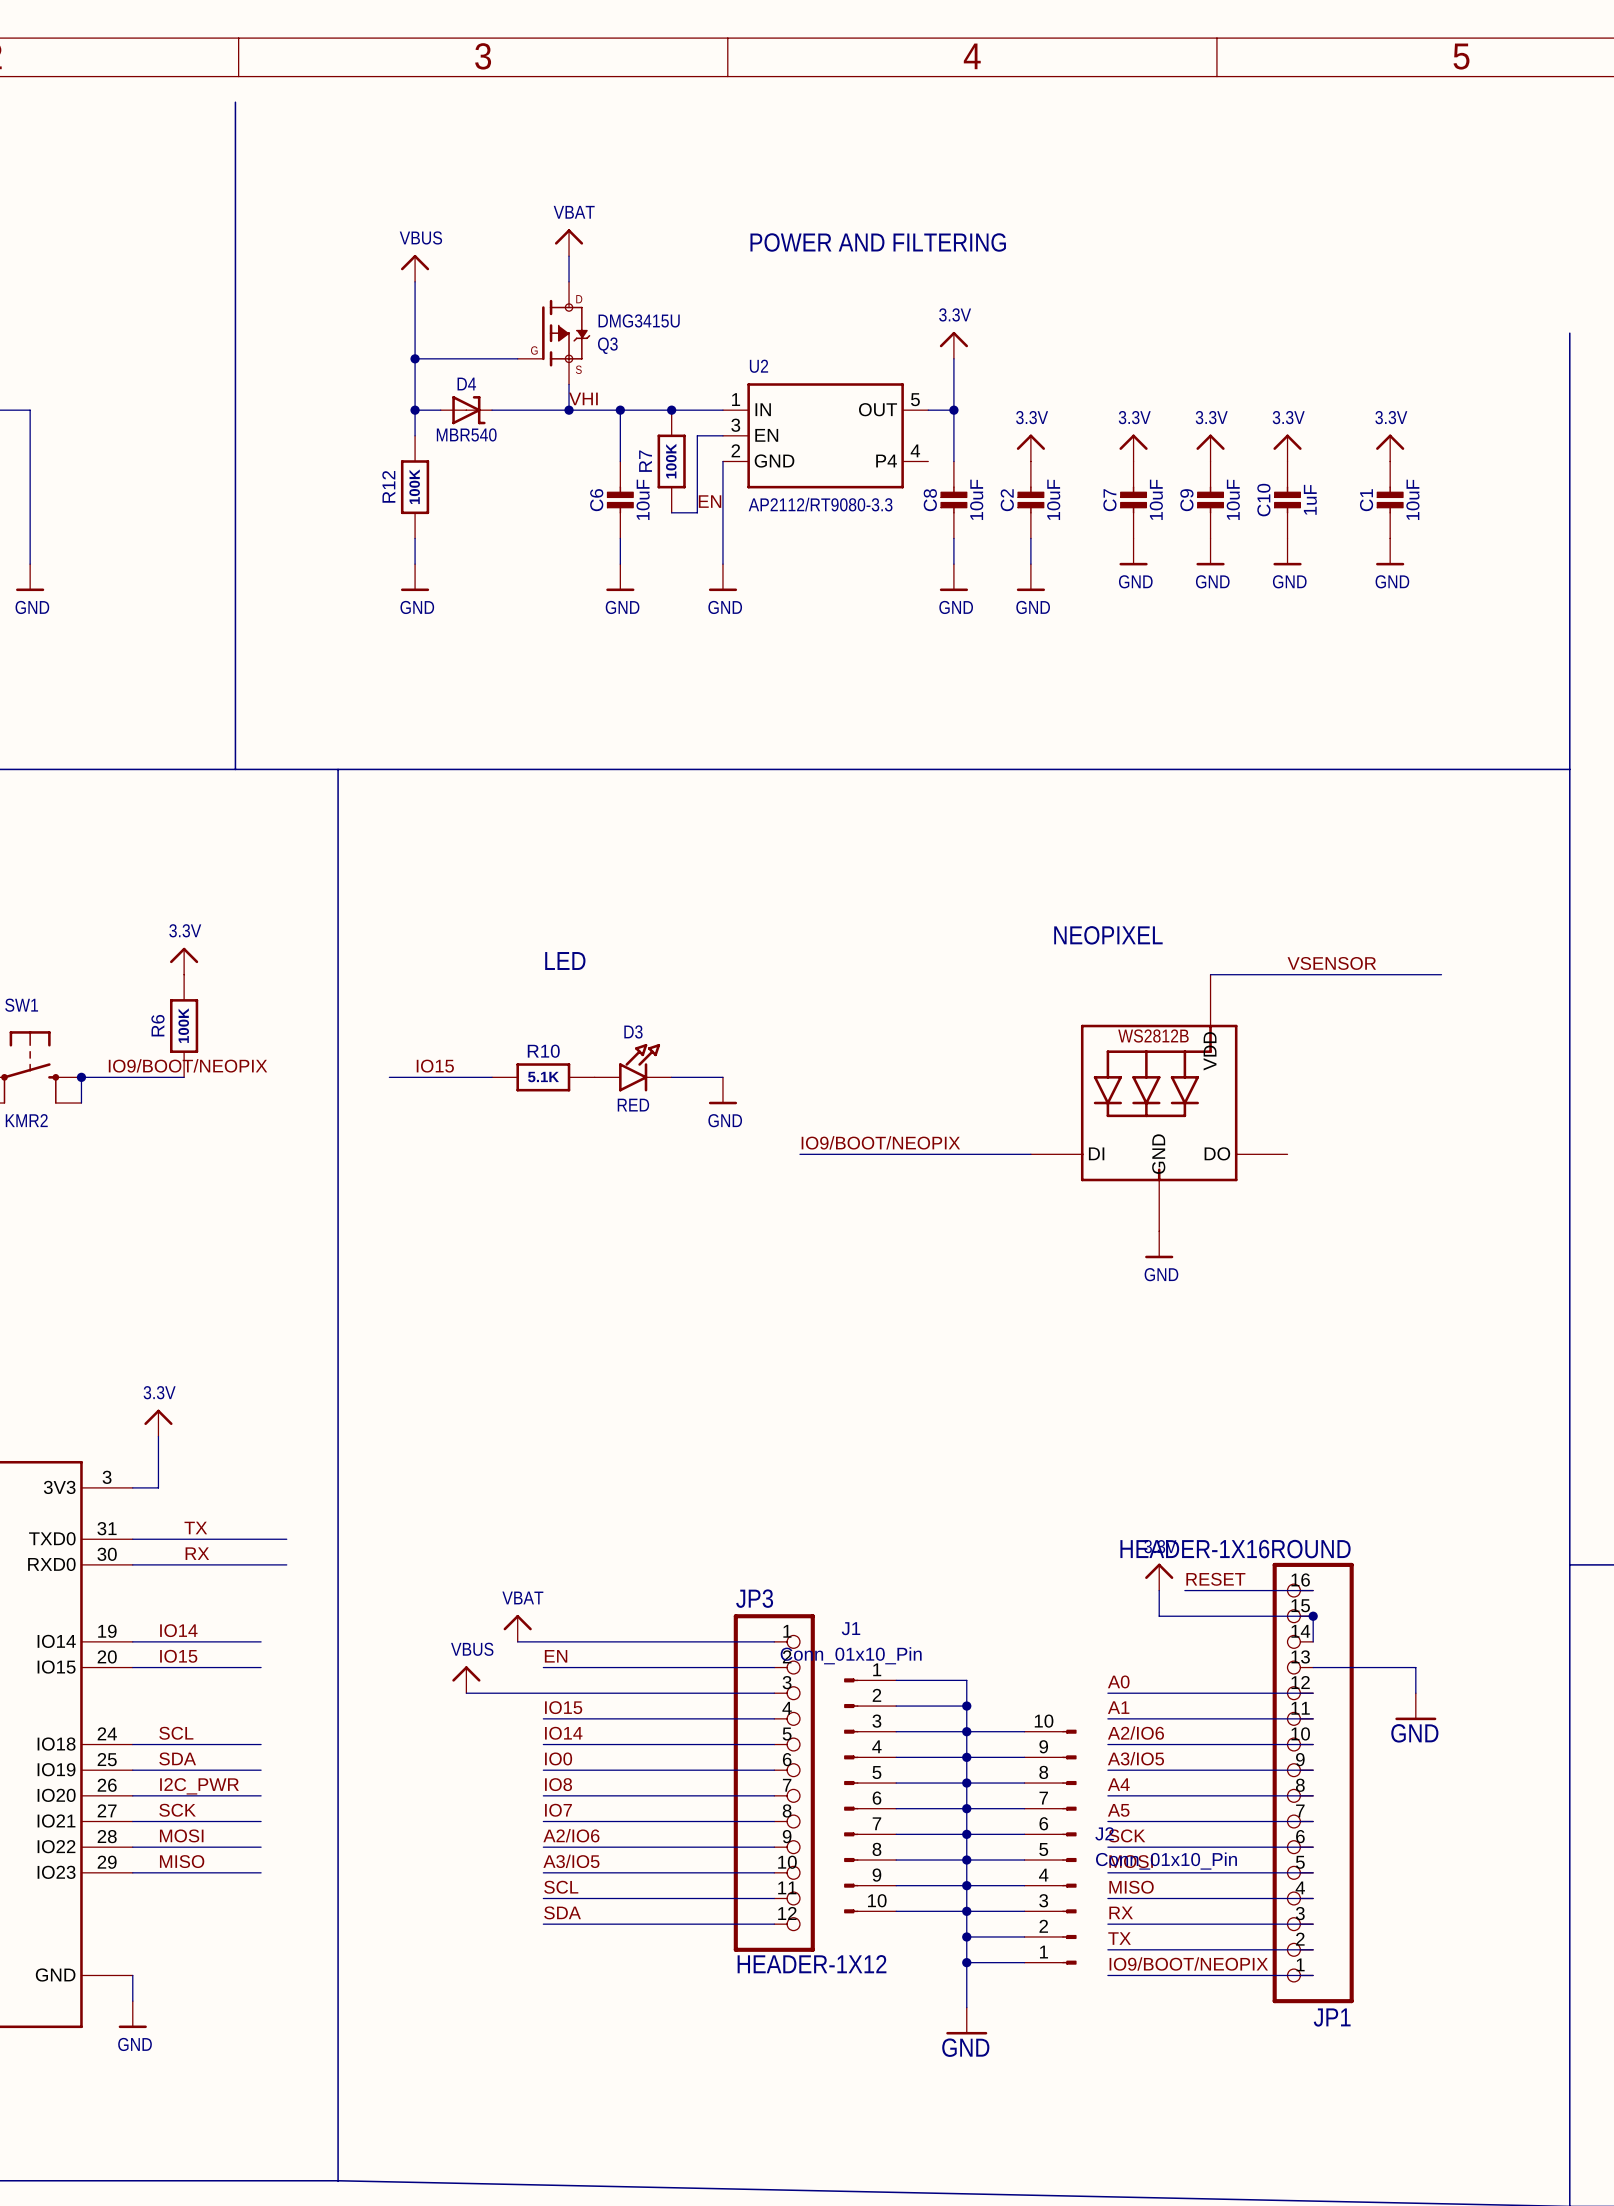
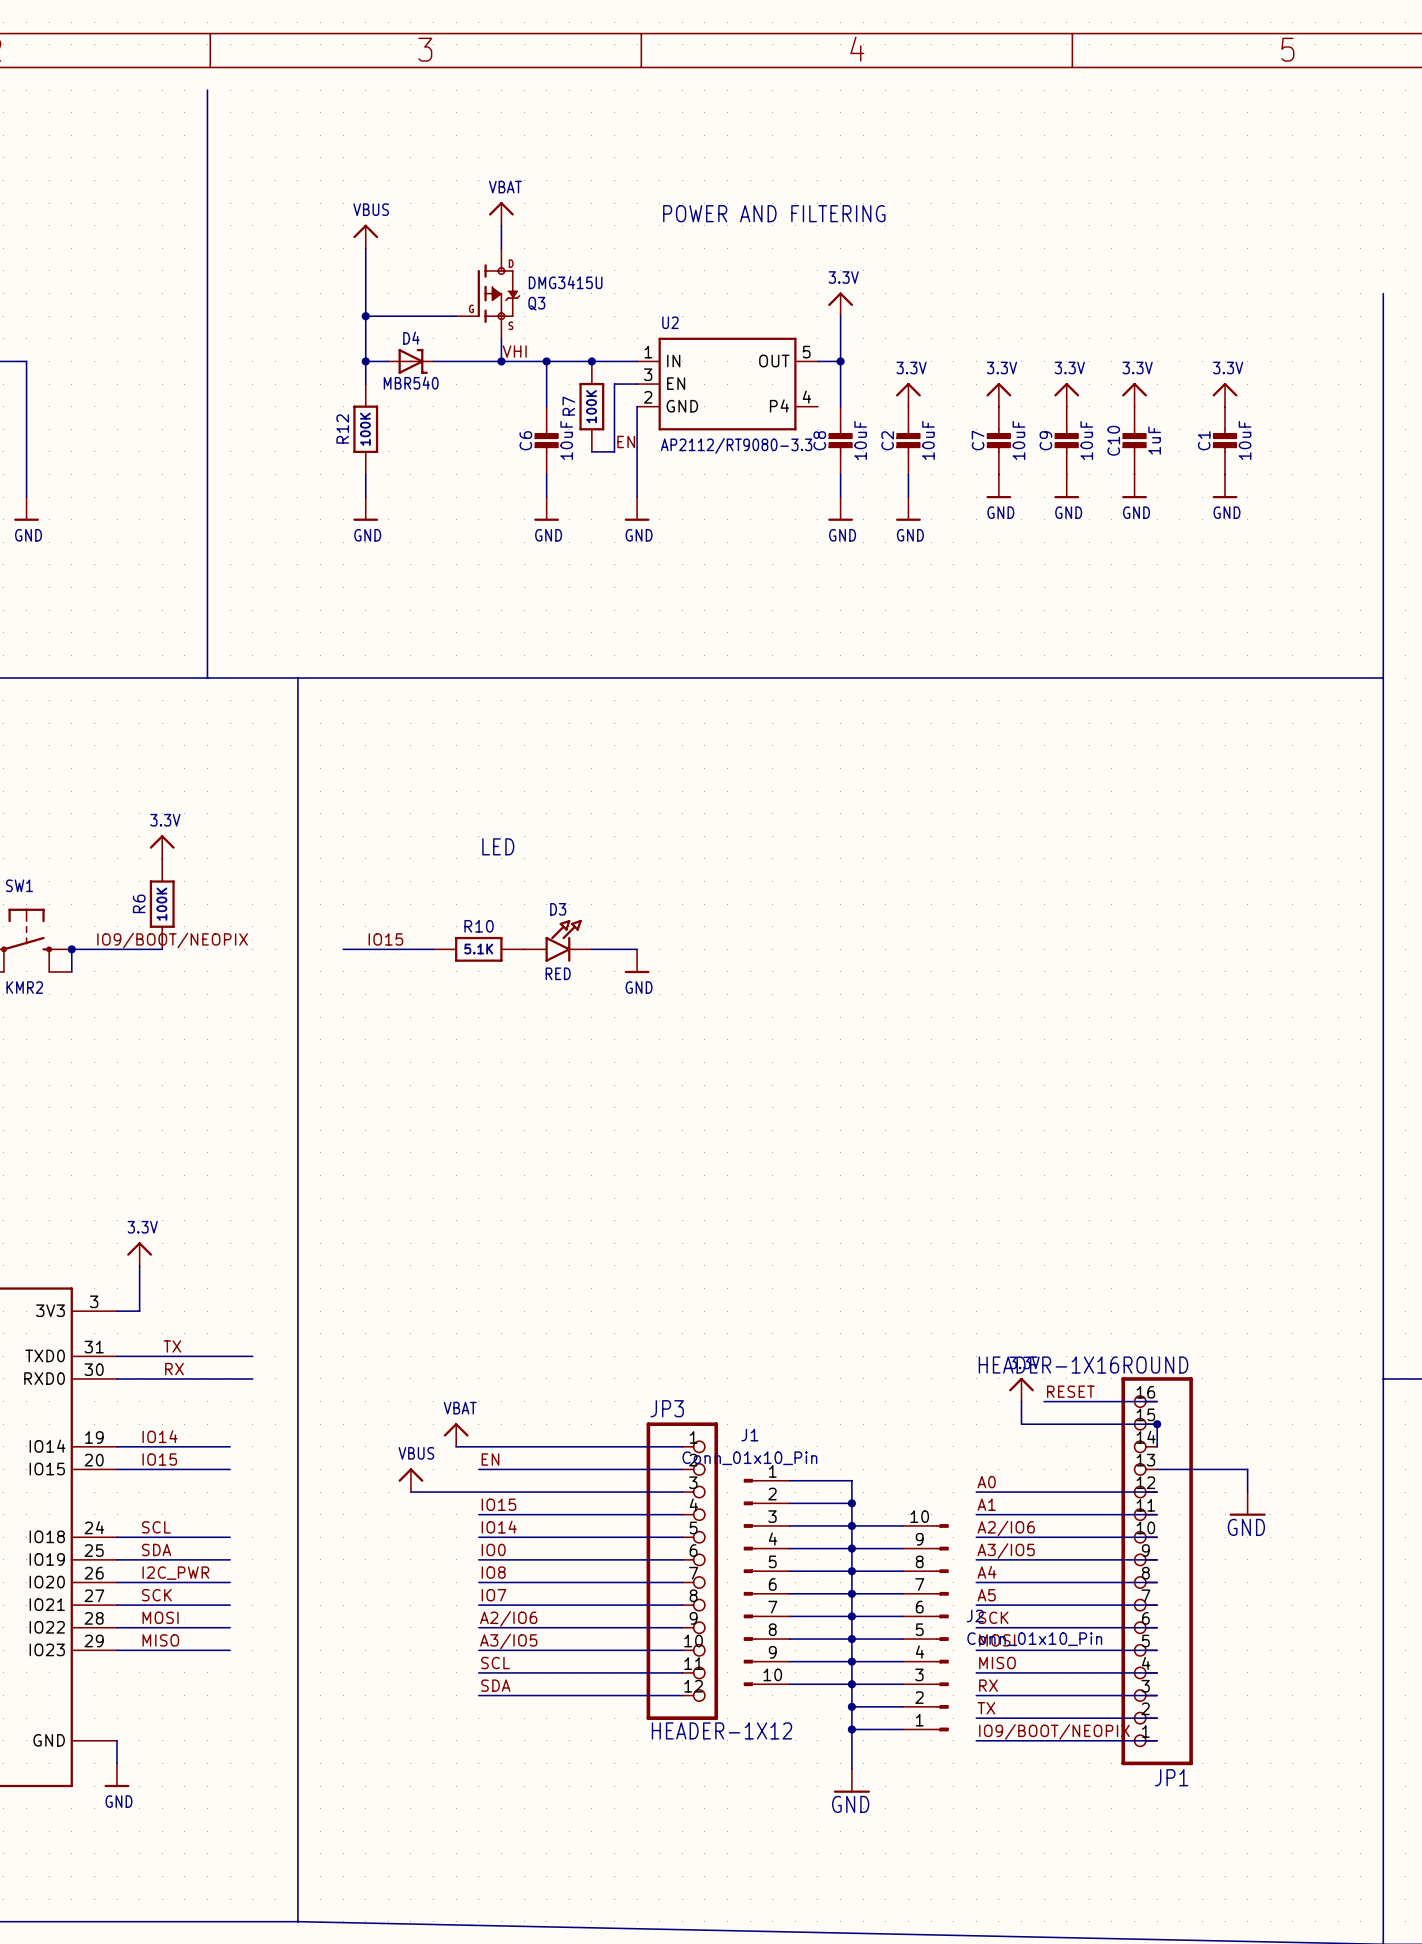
text: NEOPIXEL (1108, 935) -> none
label: VSENSOR (1331, 963) -> none
wire: (1210, 974) (1441, 974) -> none
part: (1159, 1103) -> none
label: IO9/BOOT/NEOPIX (880, 1142) -> none
wire: (799, 1154) (1030, 1154) -> none
power symbol: GND (1159, 1244) -> none

